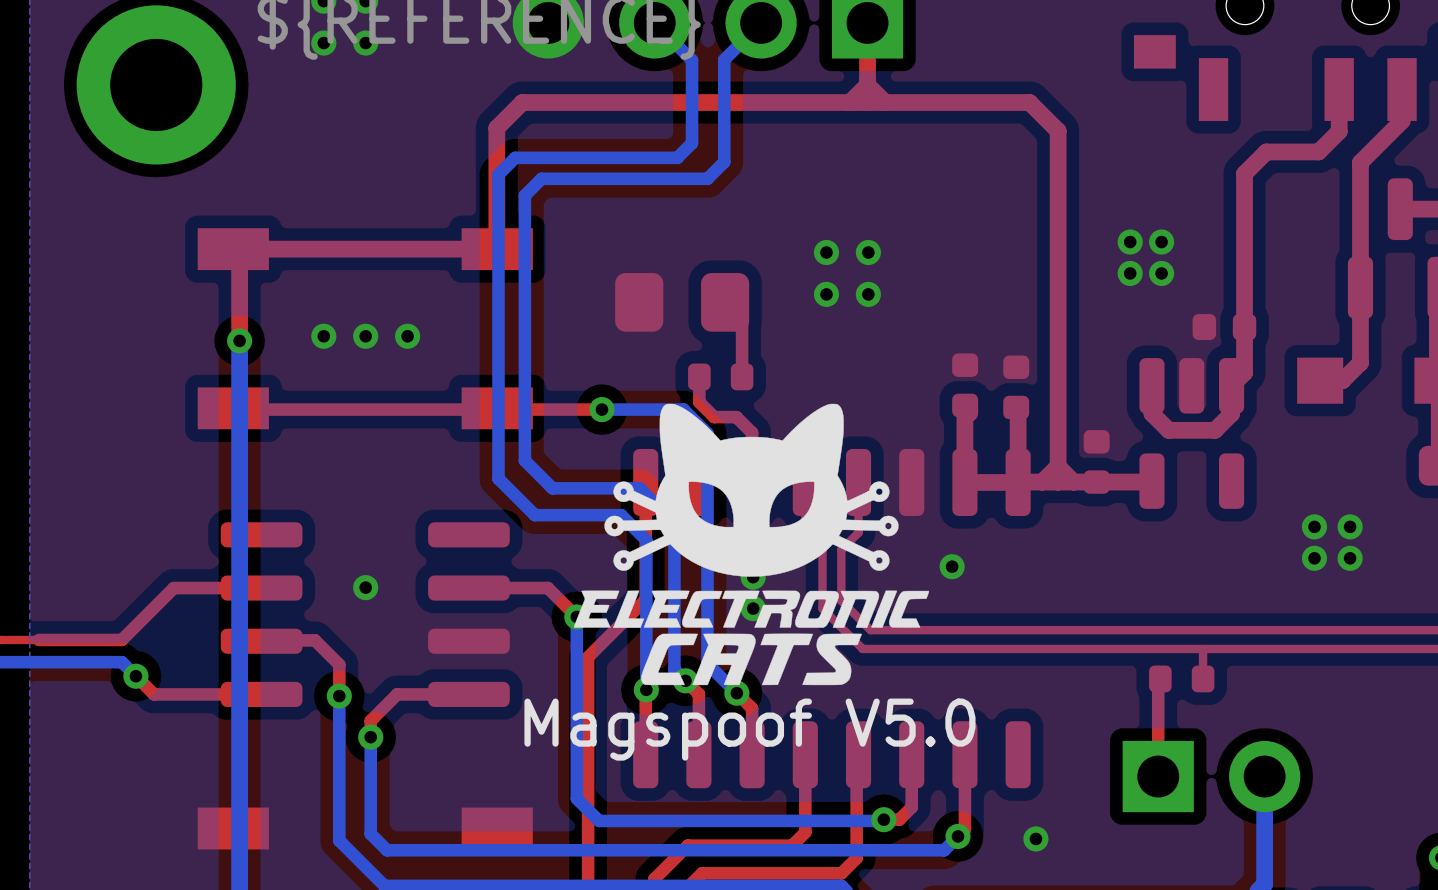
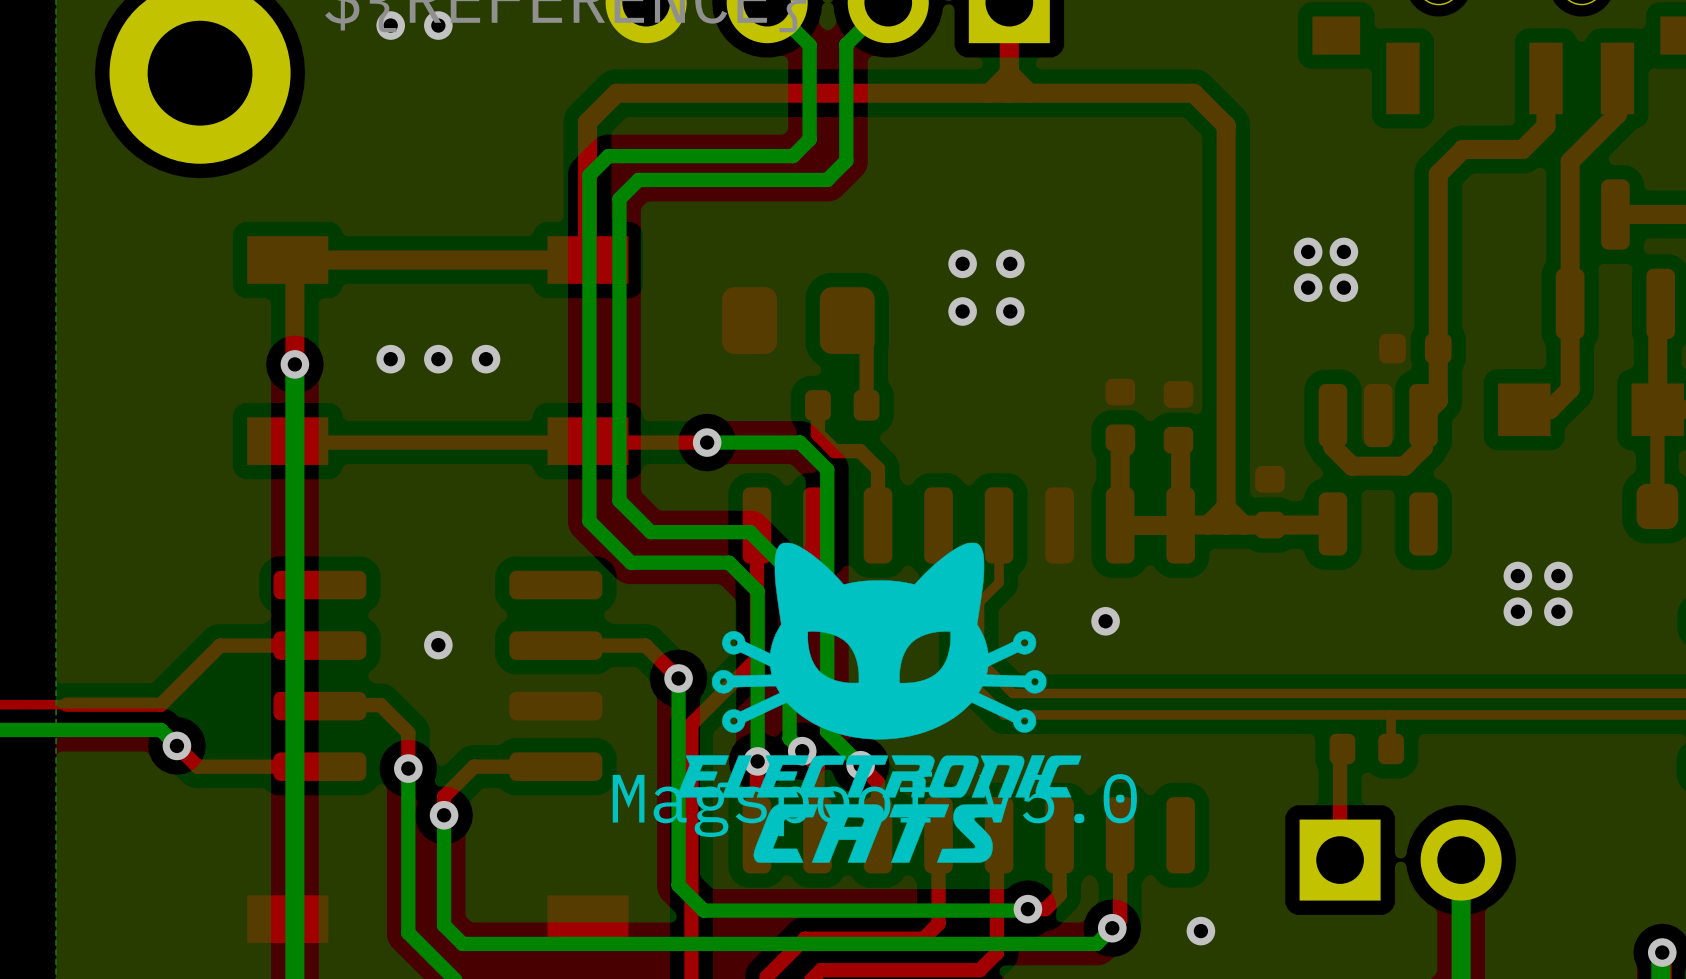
drawing position: (751, 544) -> (879, 702)

